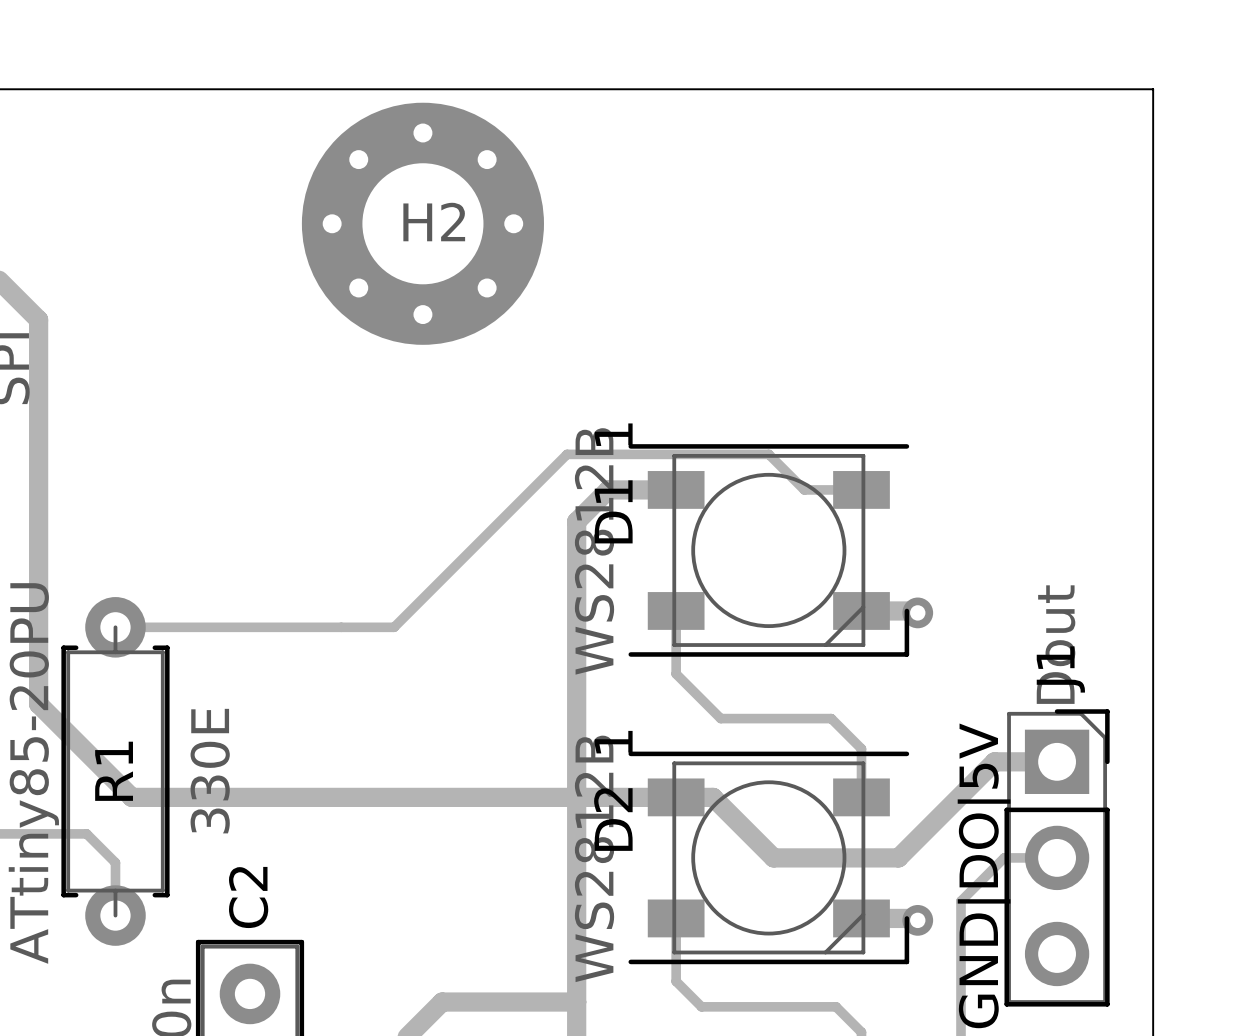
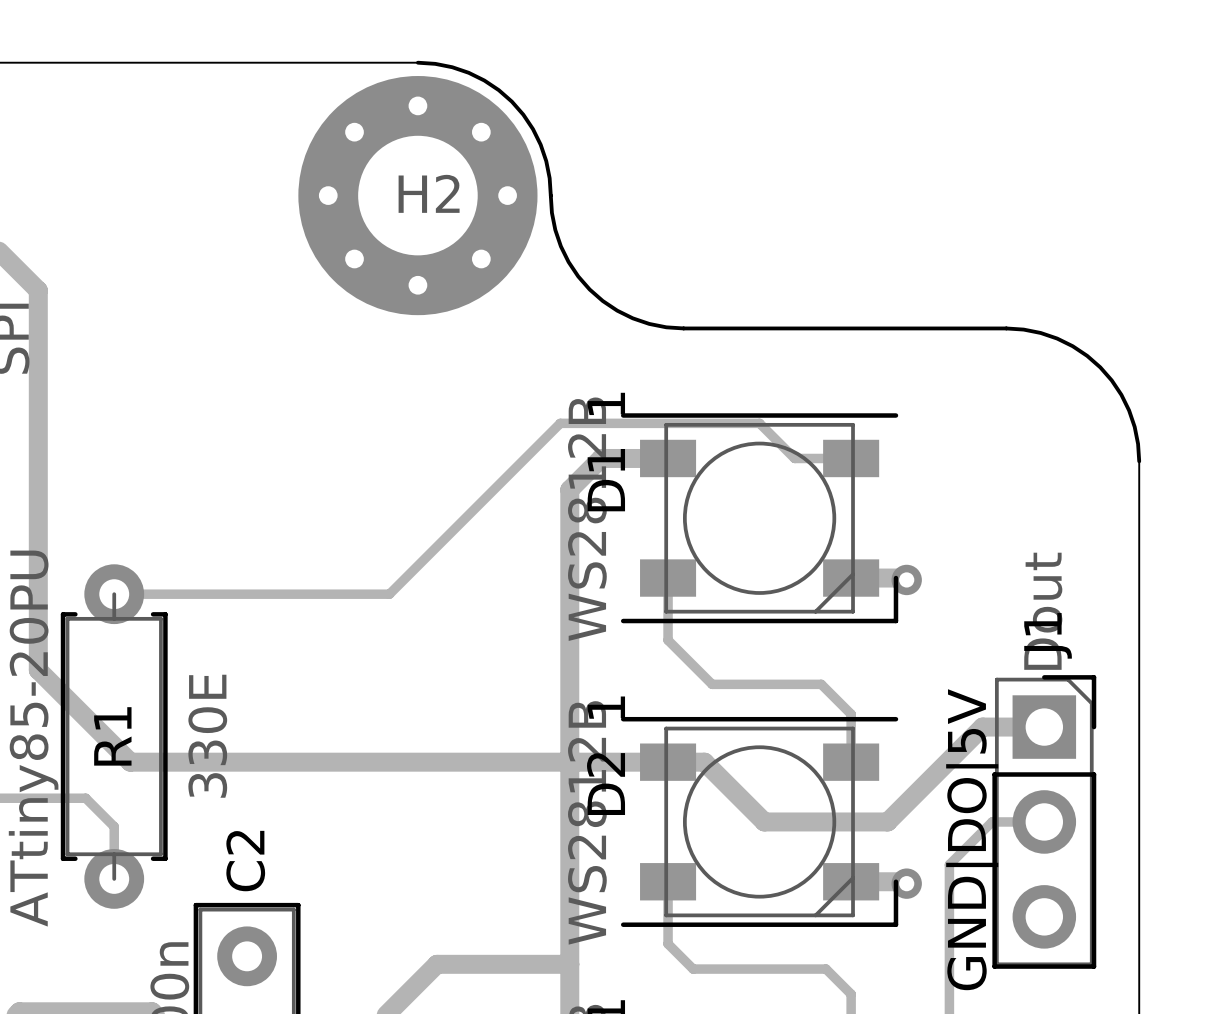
board edge: (422, 89) (1153, 89) (1153, 492) -> (417, 62) (452, 67) (484, 80) (511, 101) (523, 114) (540, 144) (546, 161) (549, 178) (551, 212) (560, 246) (578, 276) (589, 289) (617, 310) (649, 323) (683, 328) (1006, 328) (1040, 332) (1057, 338) (1087, 355) (1111, 380) (1129, 410) (1138, 443) (1139, 461)

